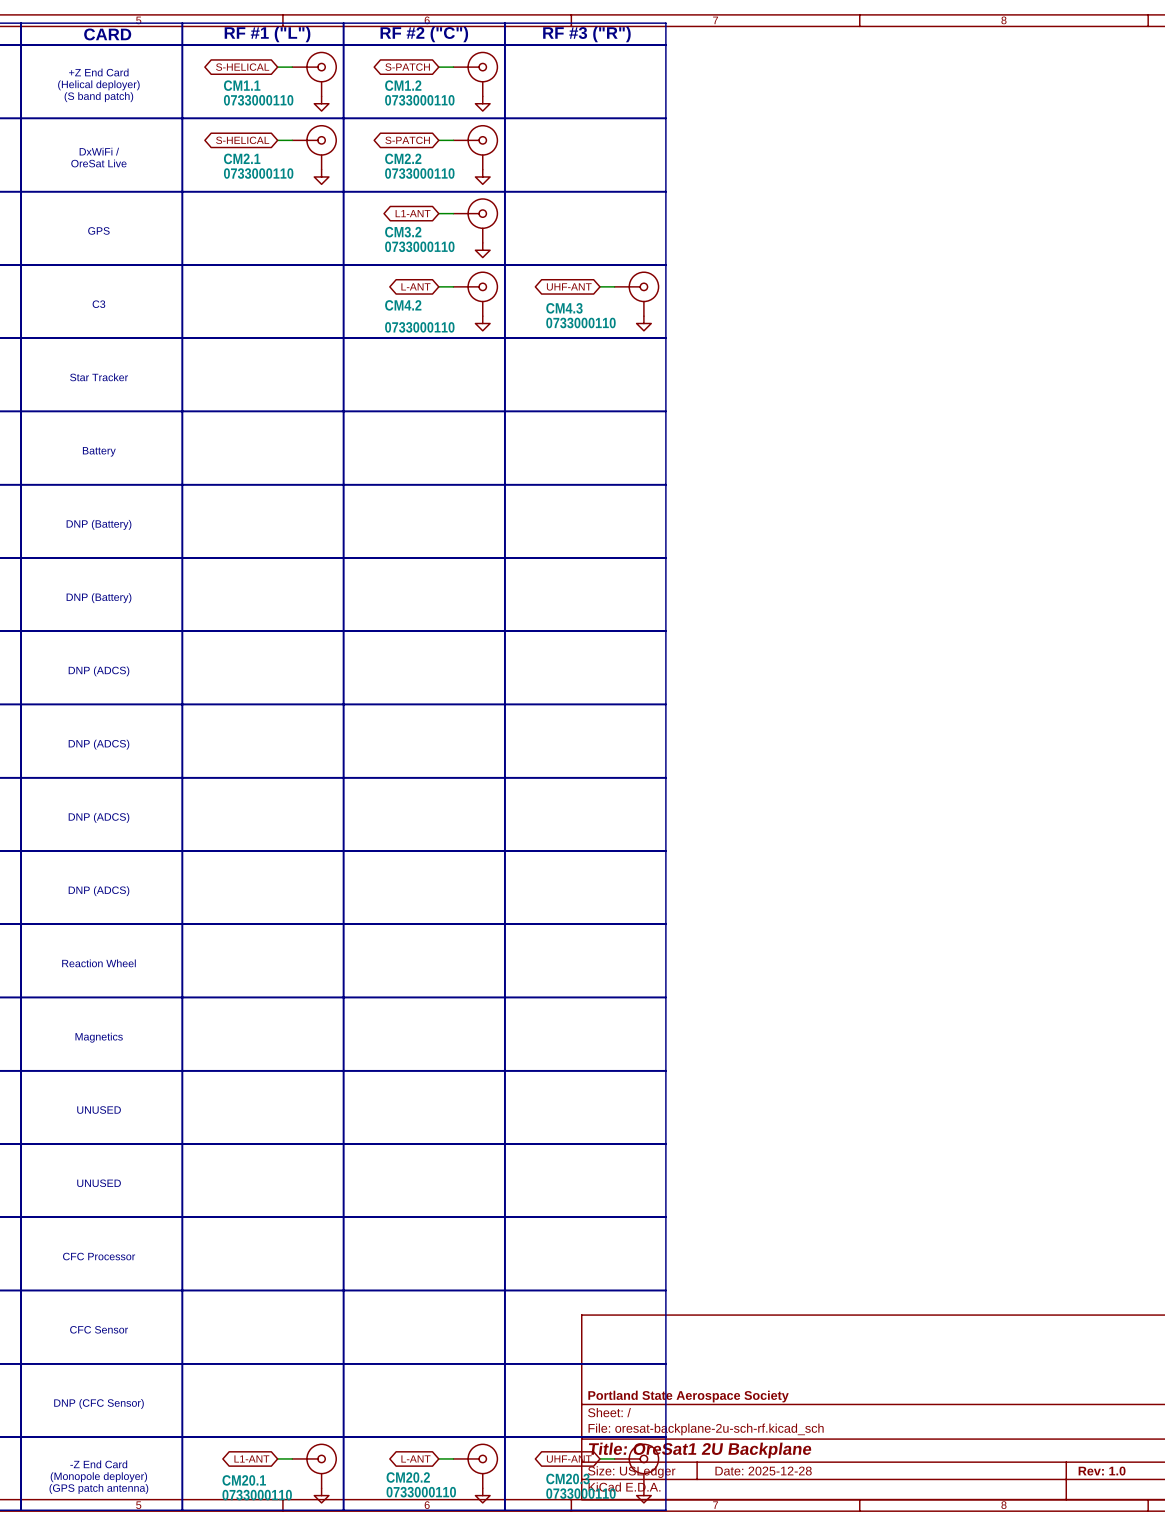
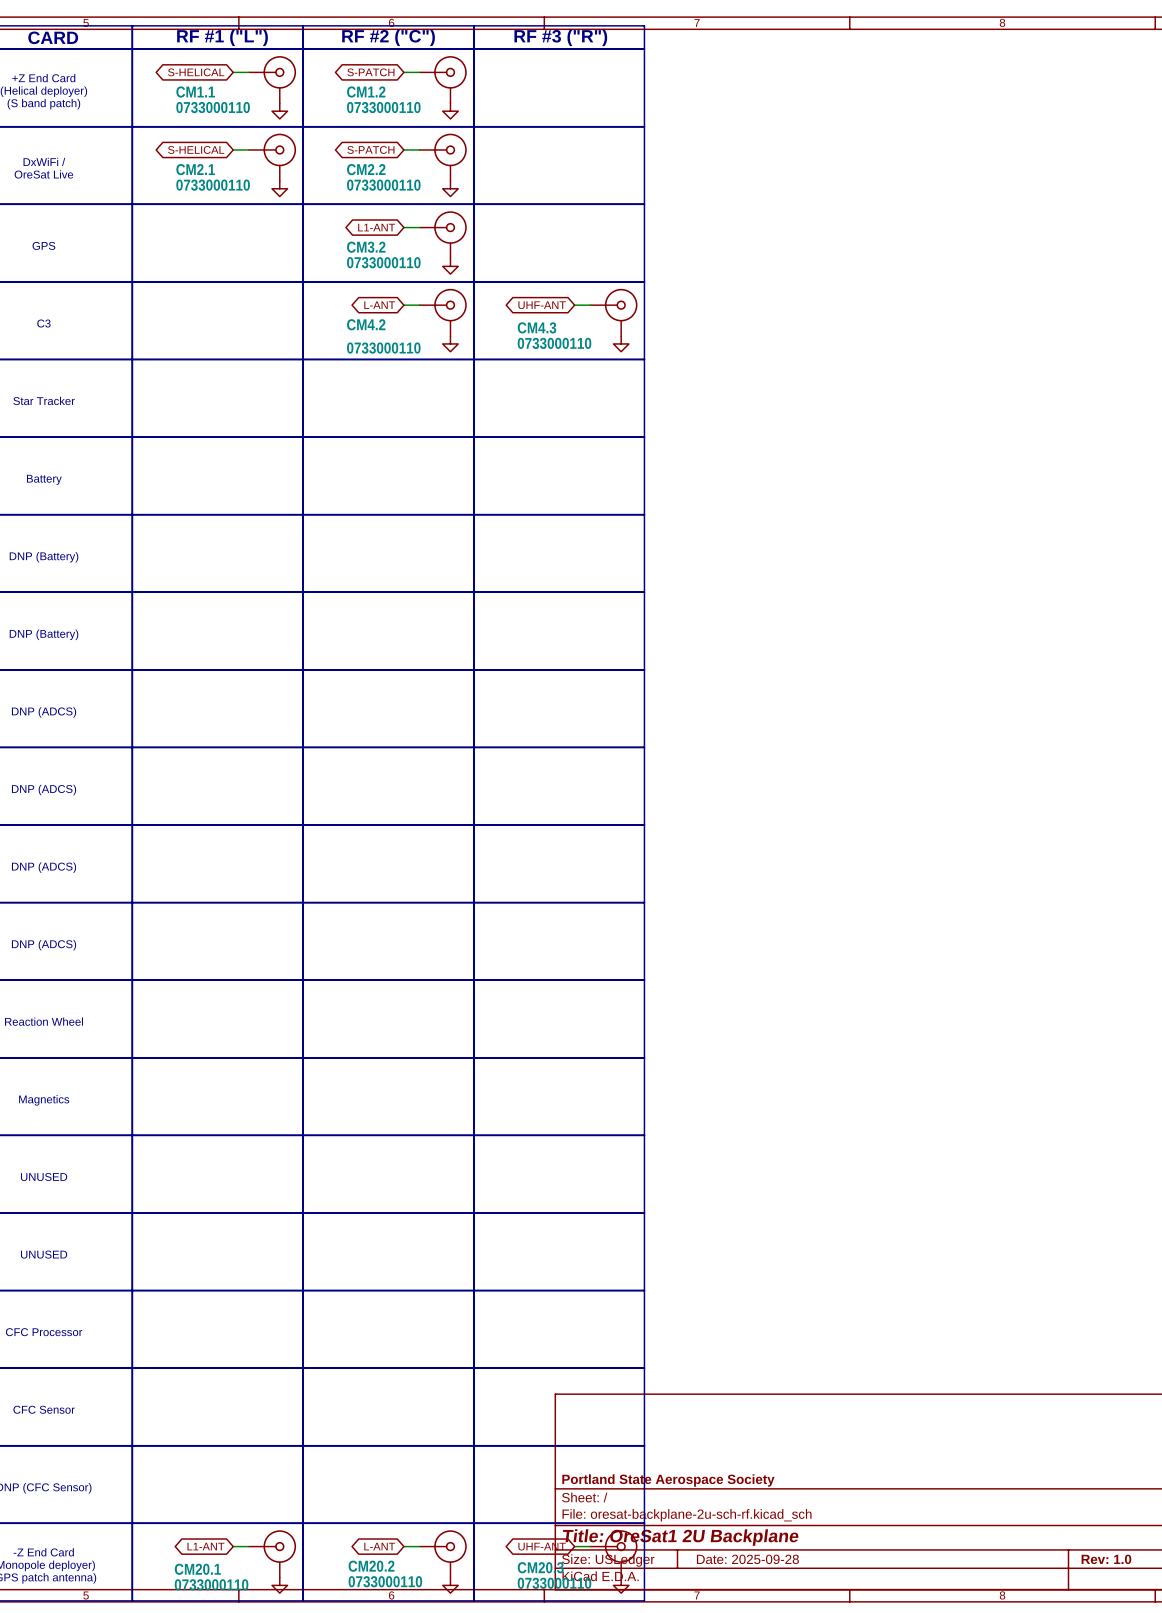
title block: Date: 2025-12-28 (763, 1471) -> Date: 2025-09-28 (747, 1559)

